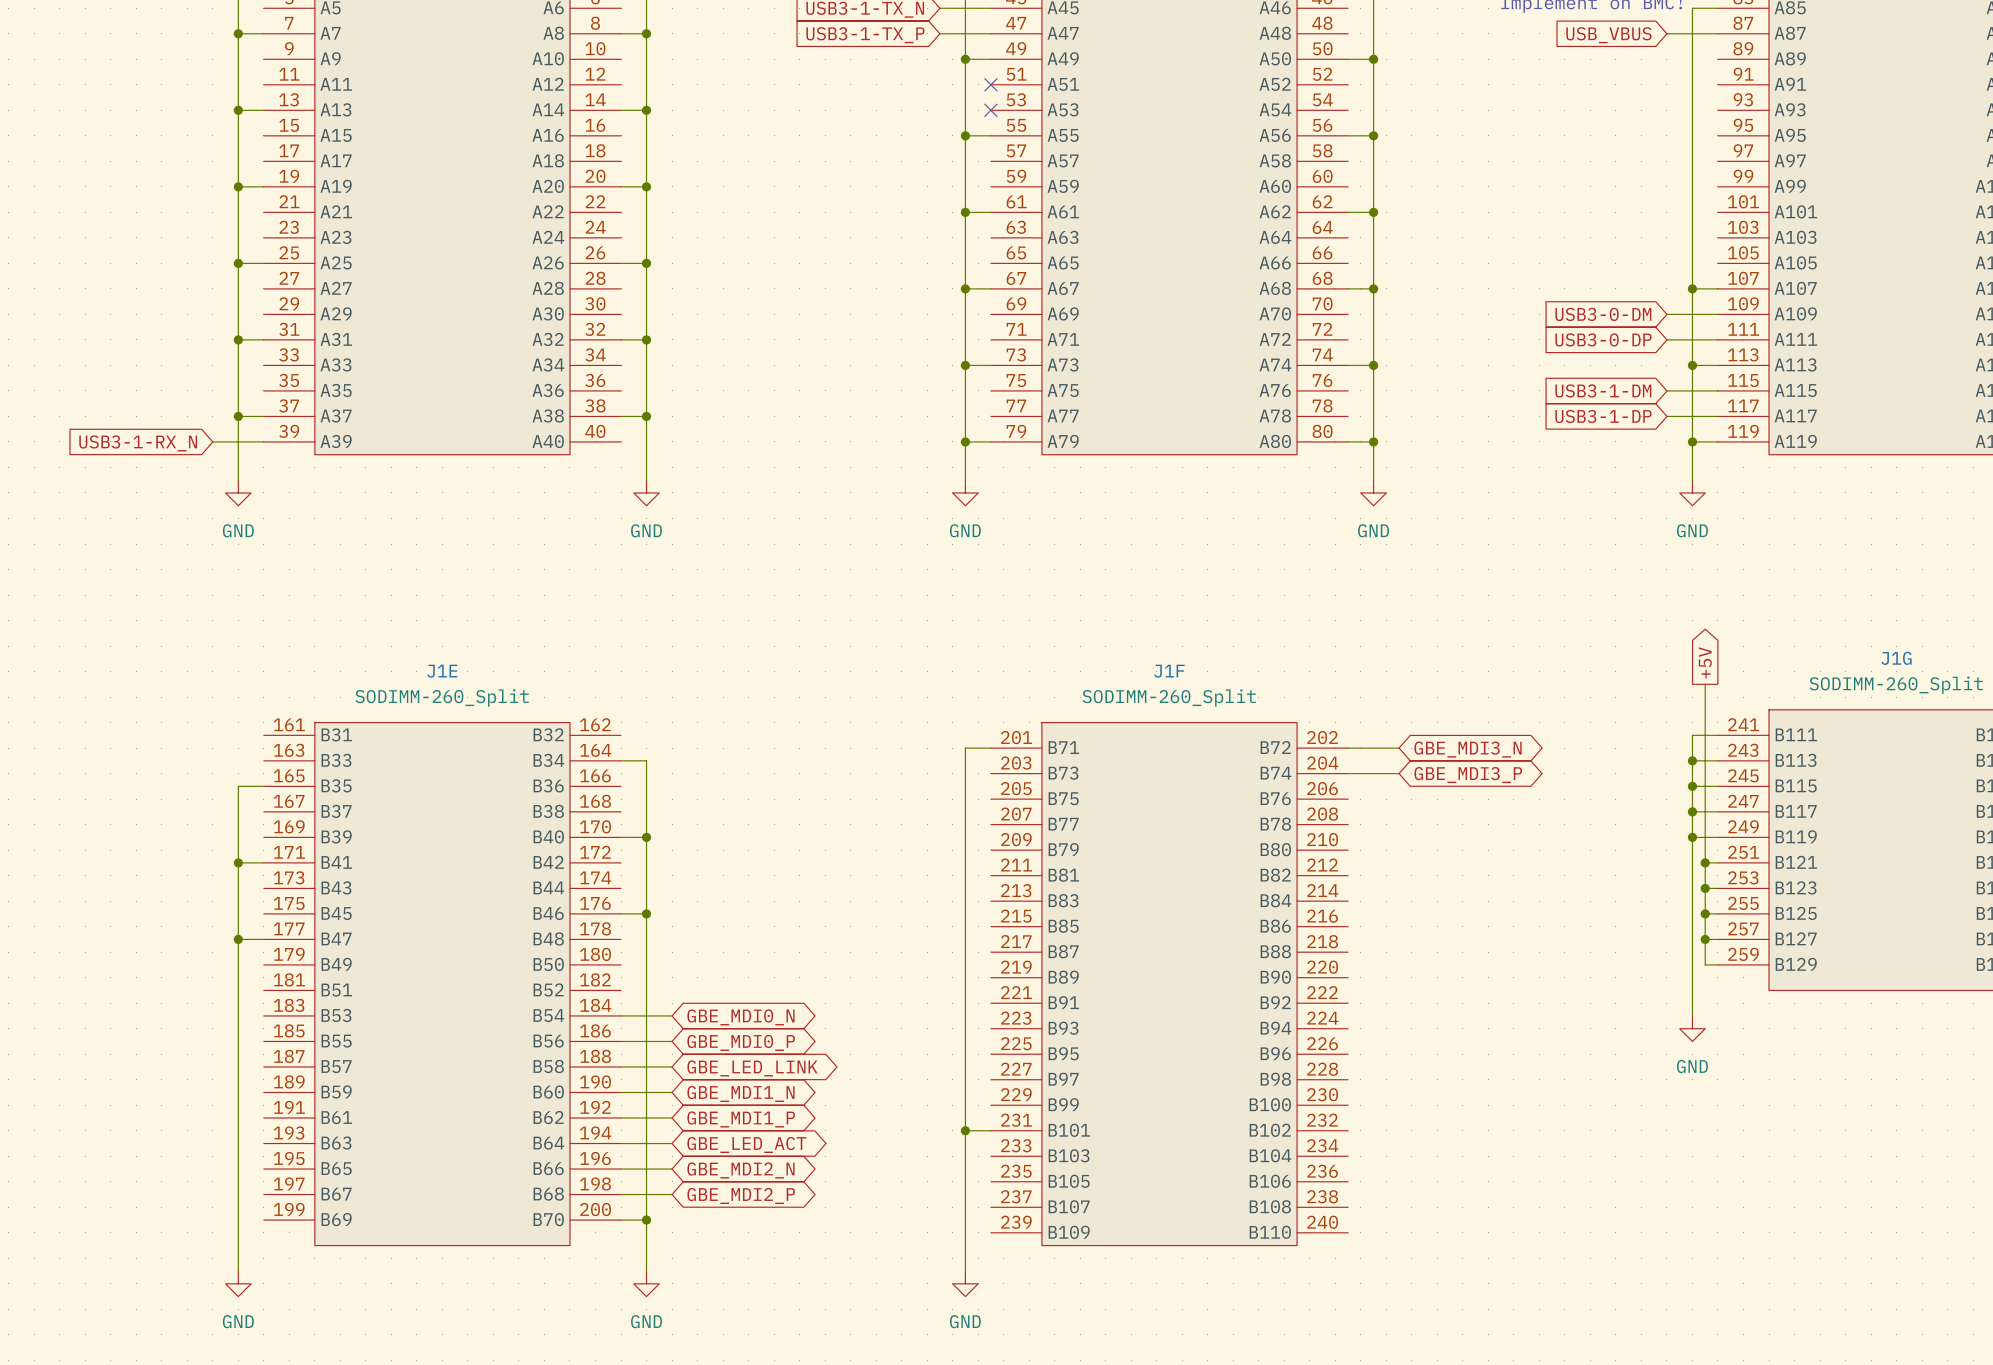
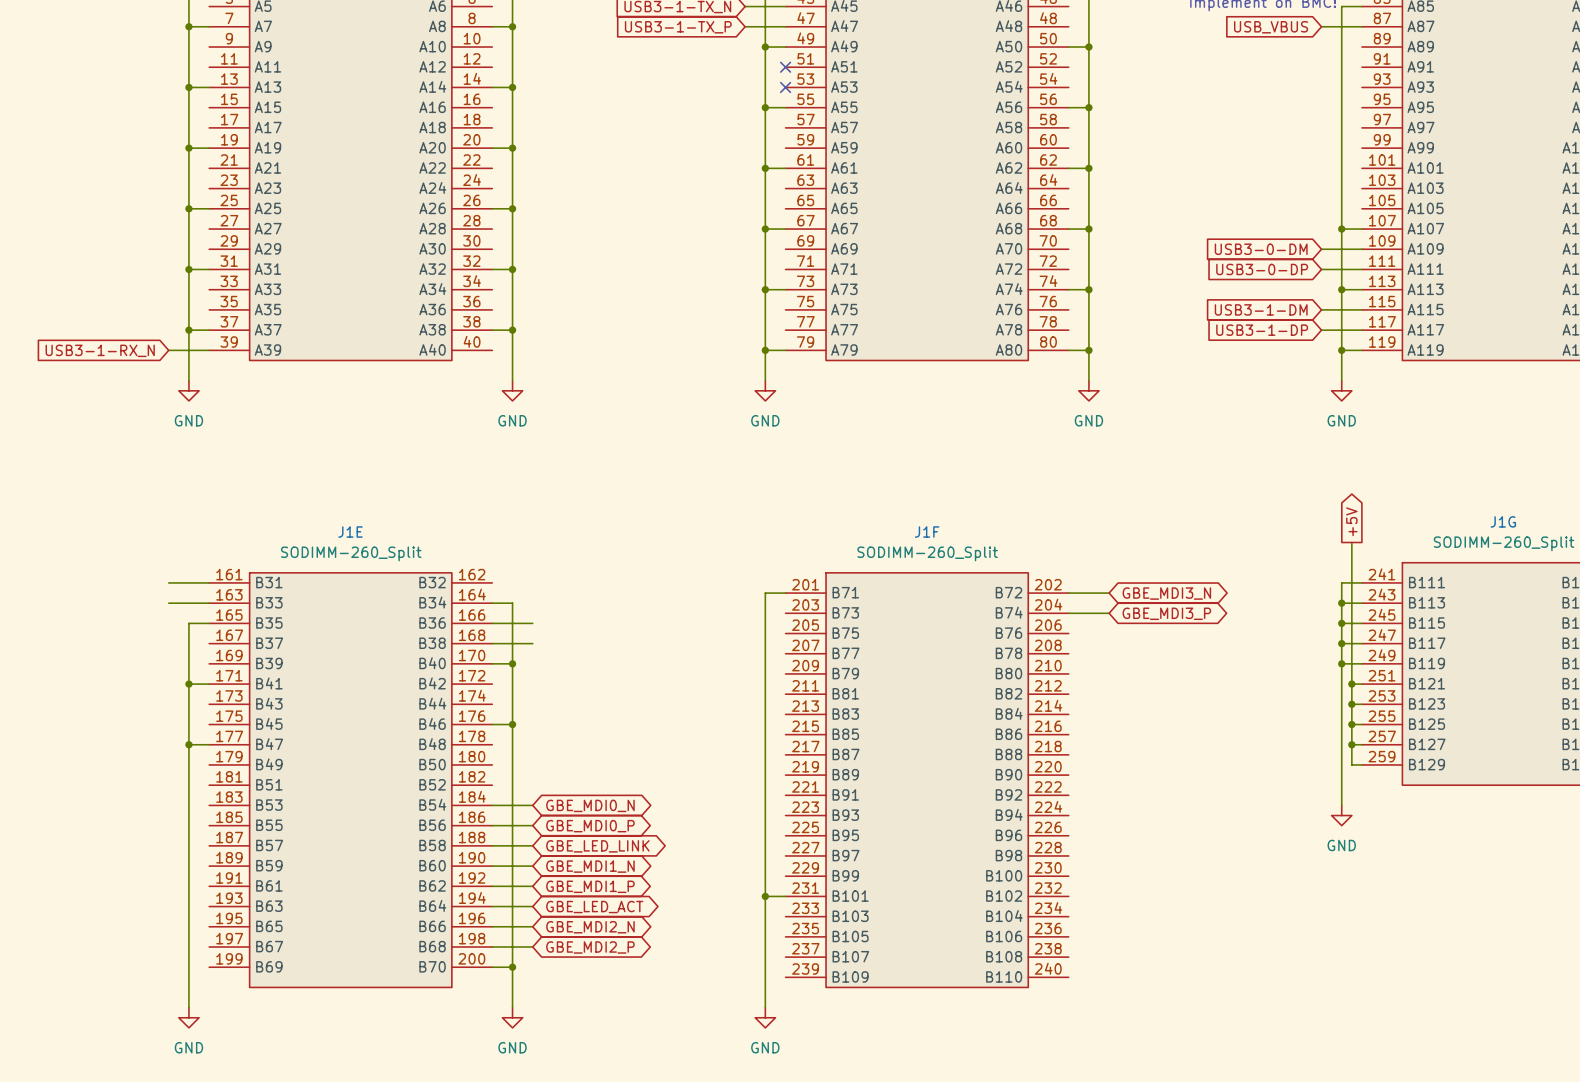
wire: none -> (168, 582) (209, 582)
wire: none -> (168, 603) (209, 603)
wire: none -> (492, 623) (532, 623)
wire: none -> (492, 643) (532, 643)

